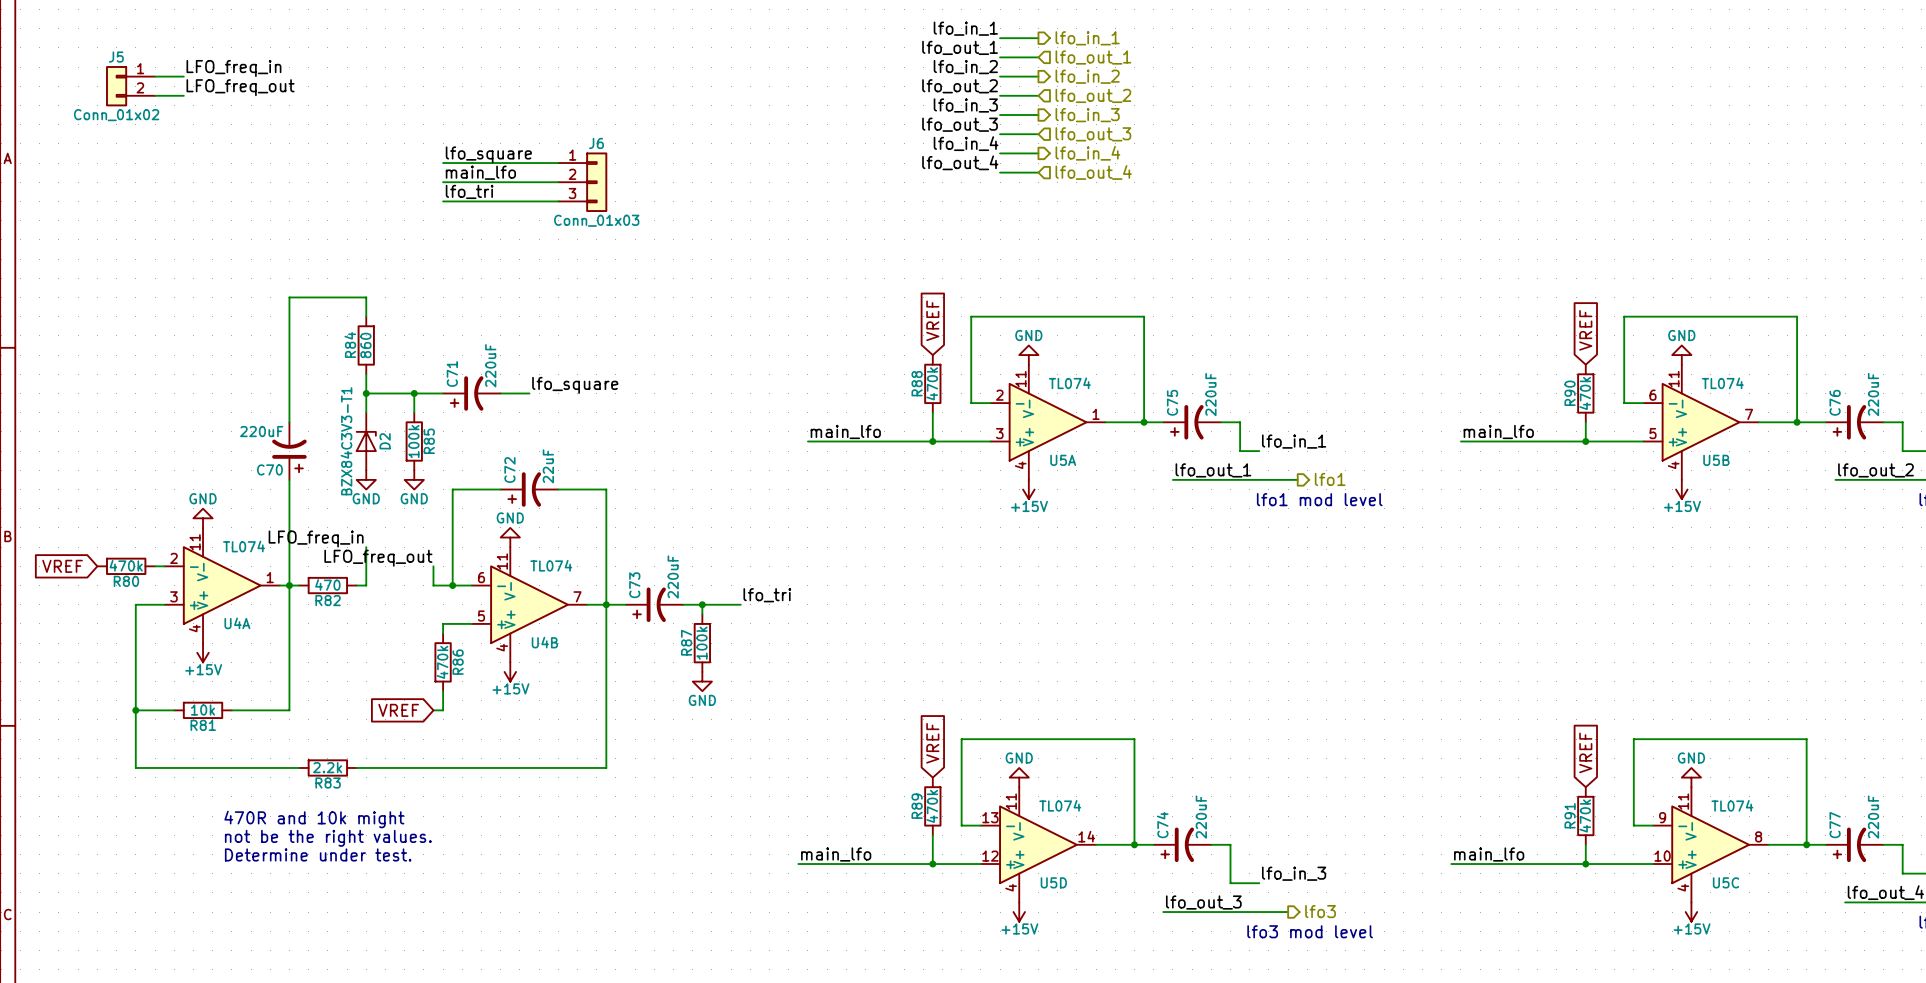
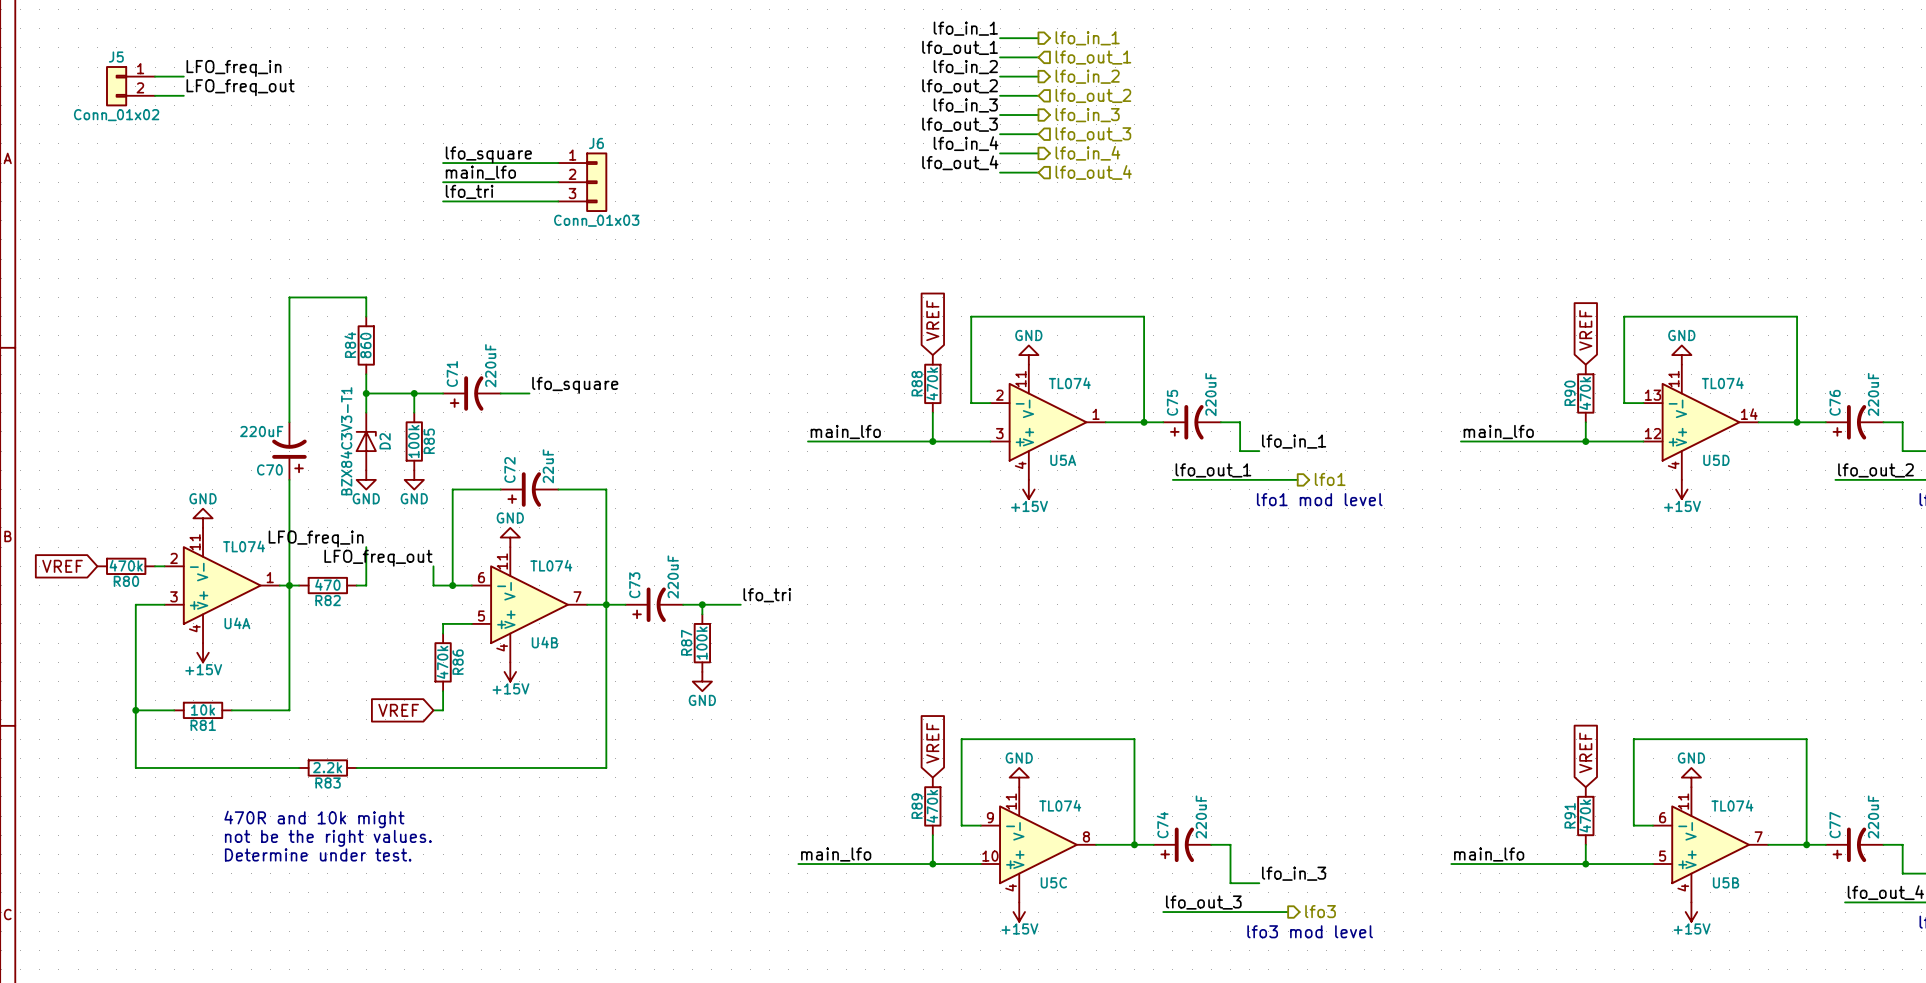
U5B position: (1701, 422) -> (1710, 844)
U5D position: (1038, 844) -> (1701, 422)
U5C position: (1710, 844) -> (1038, 844)

